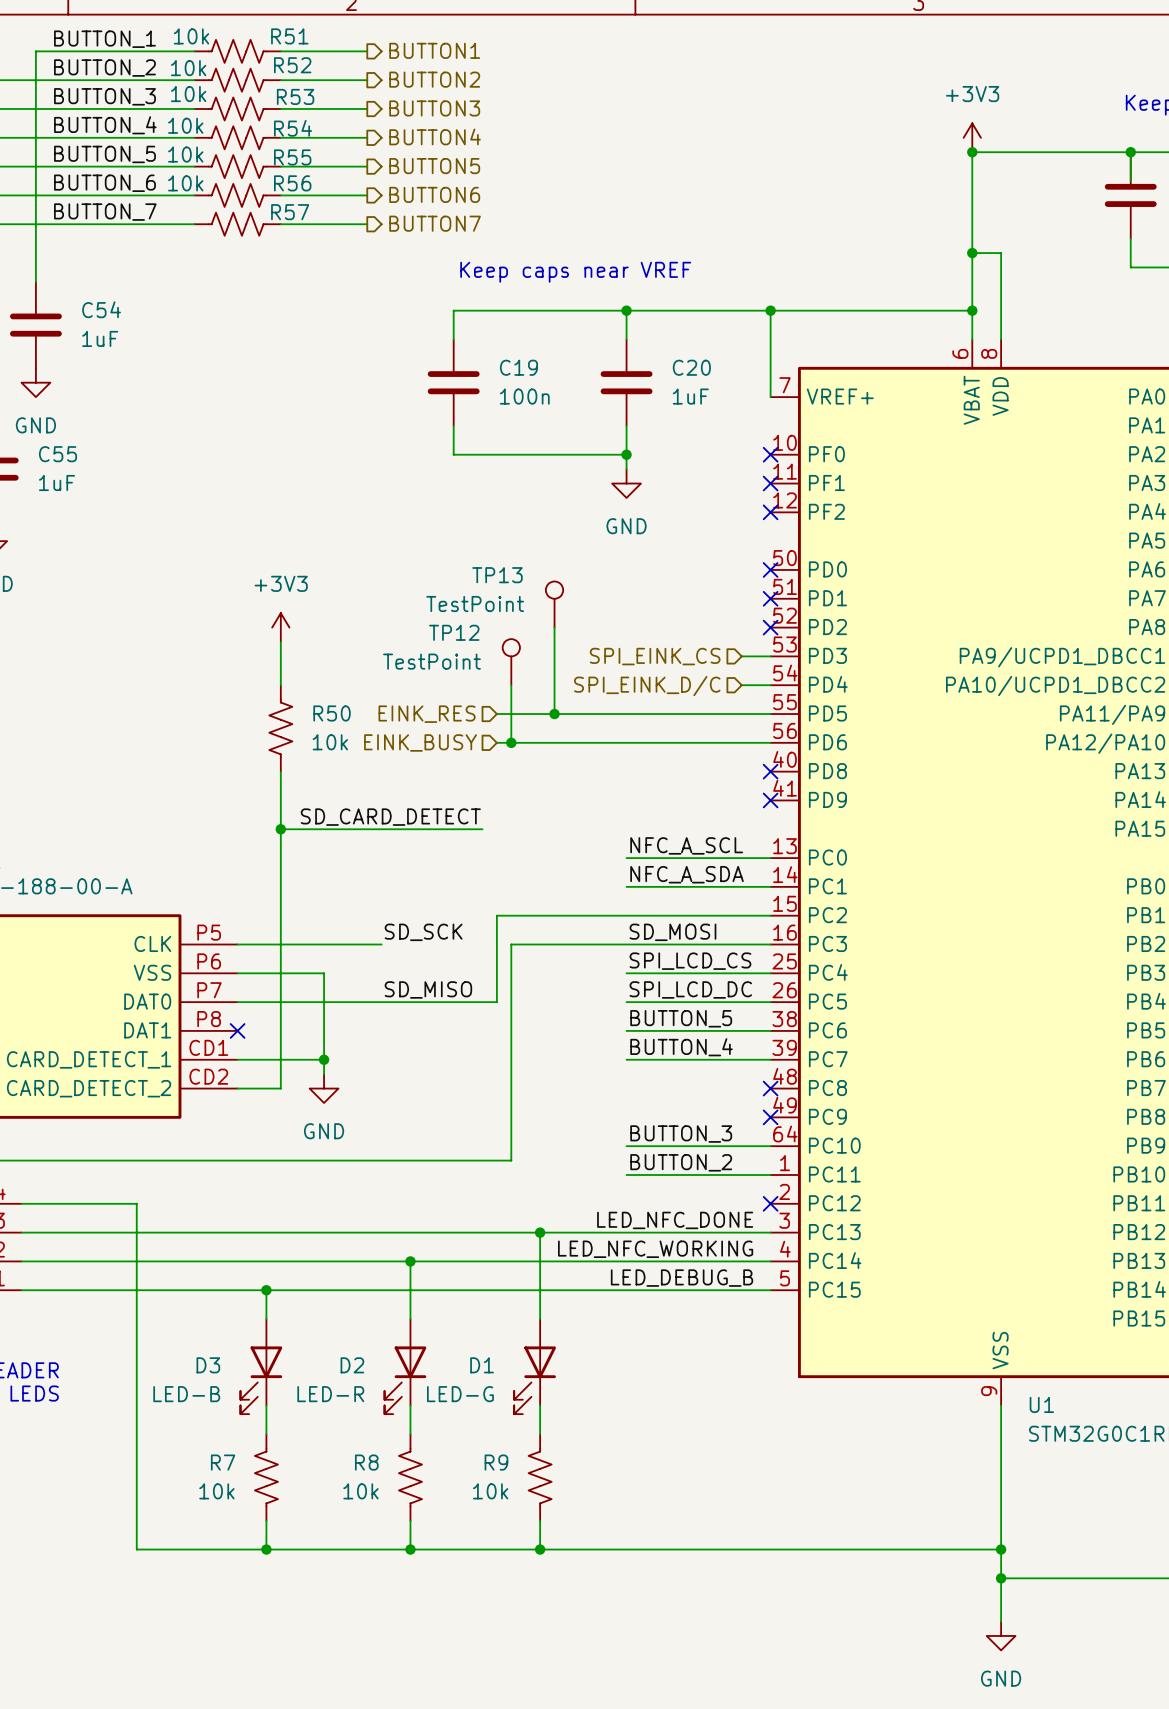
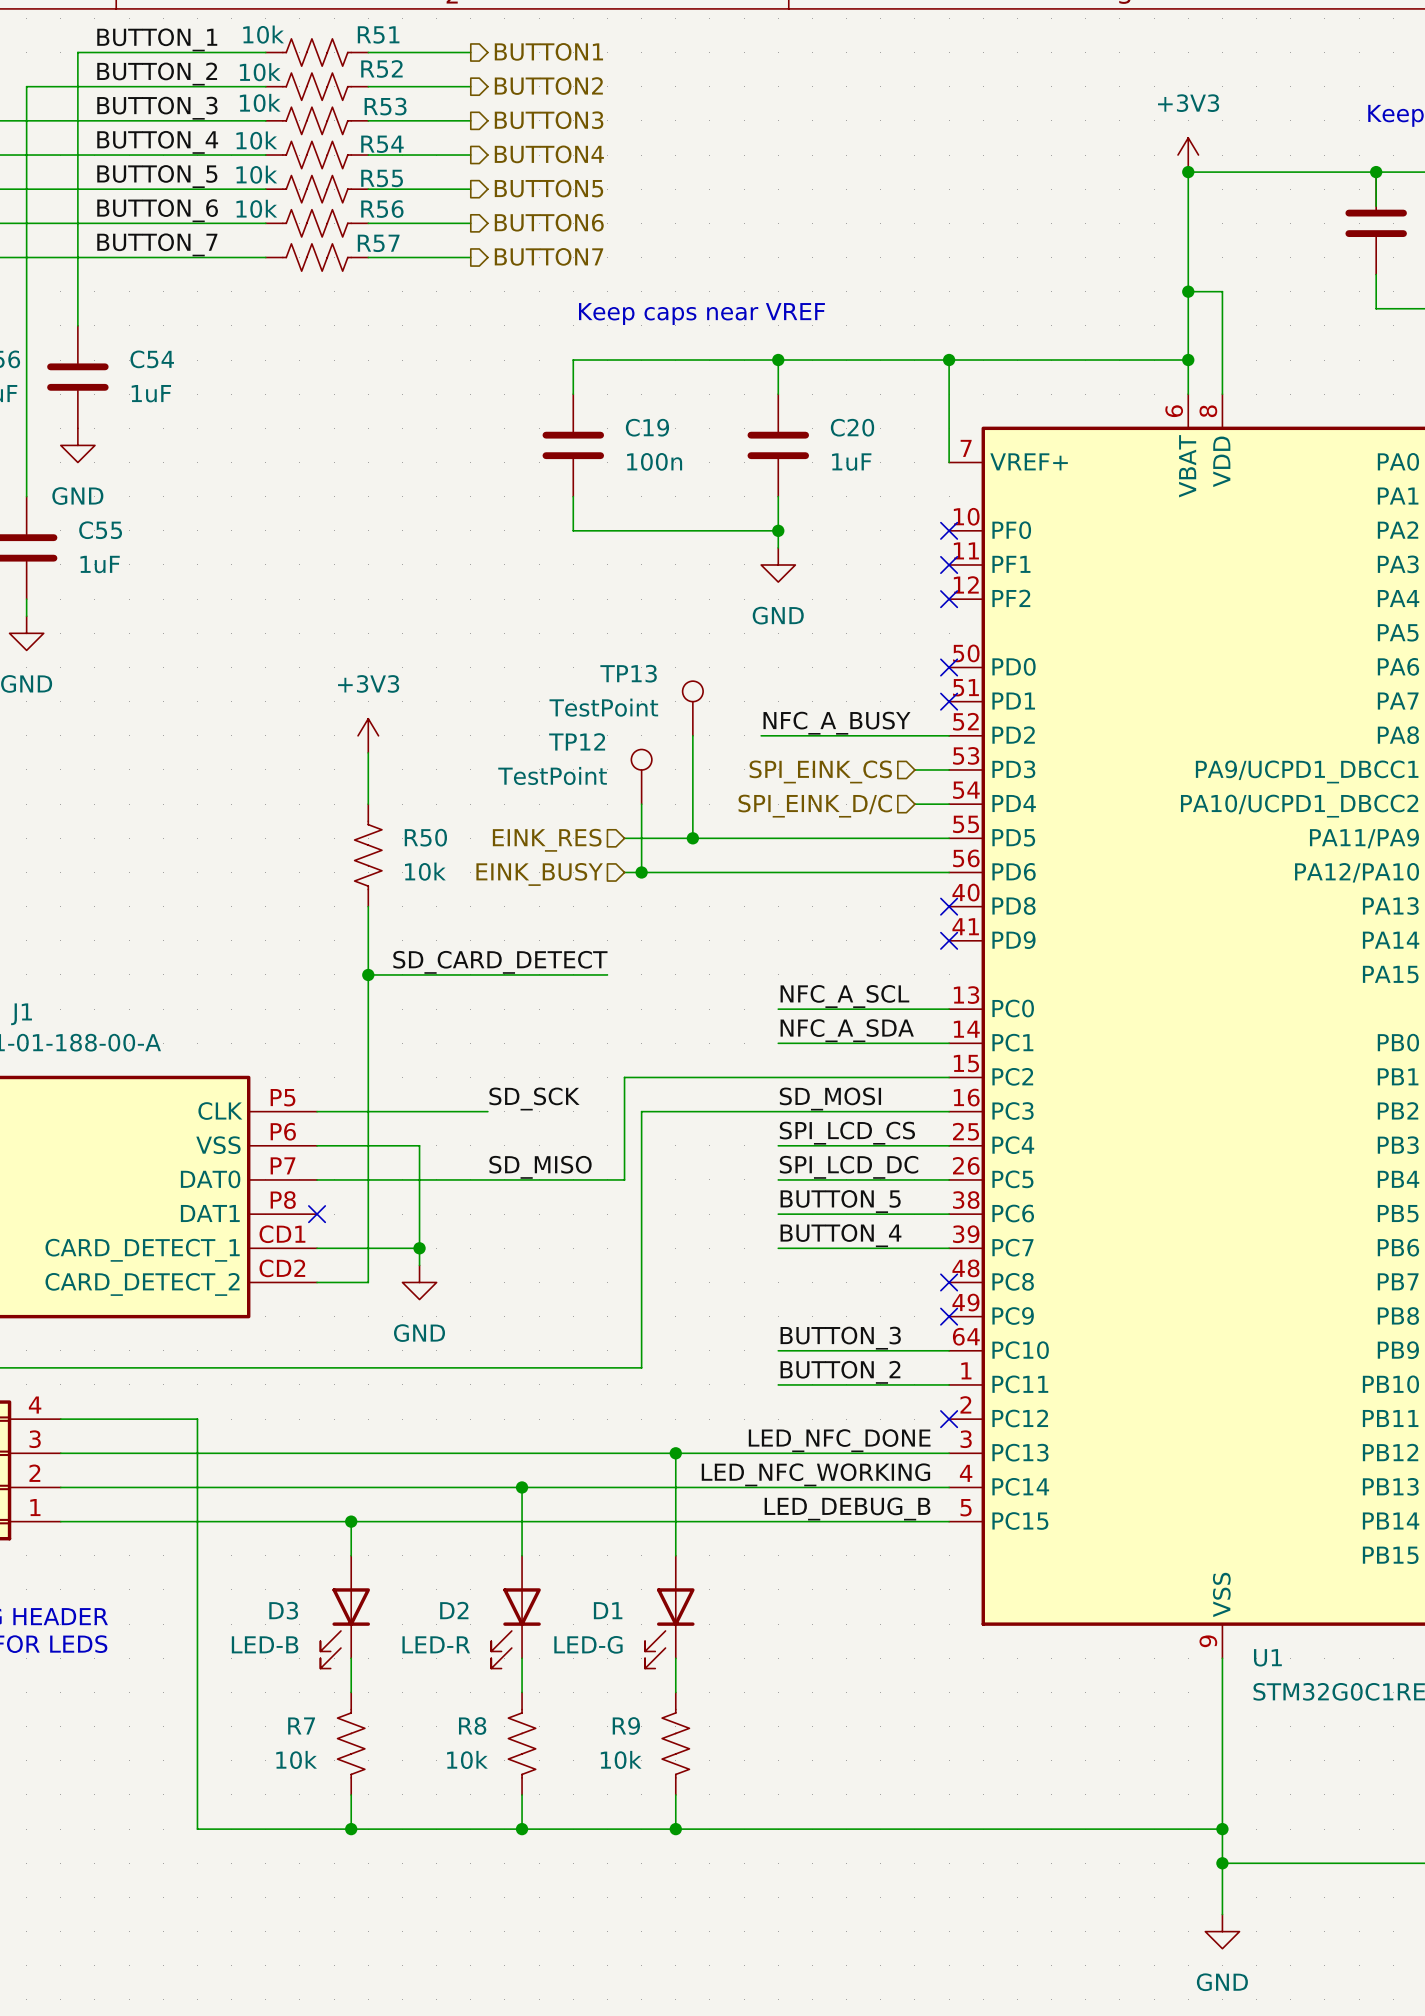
label: none -> NFC_A_BUSY (836, 723)
wire: none -> (761, 735) (949, 735)
no-connect mark: (770, 627) -> none

